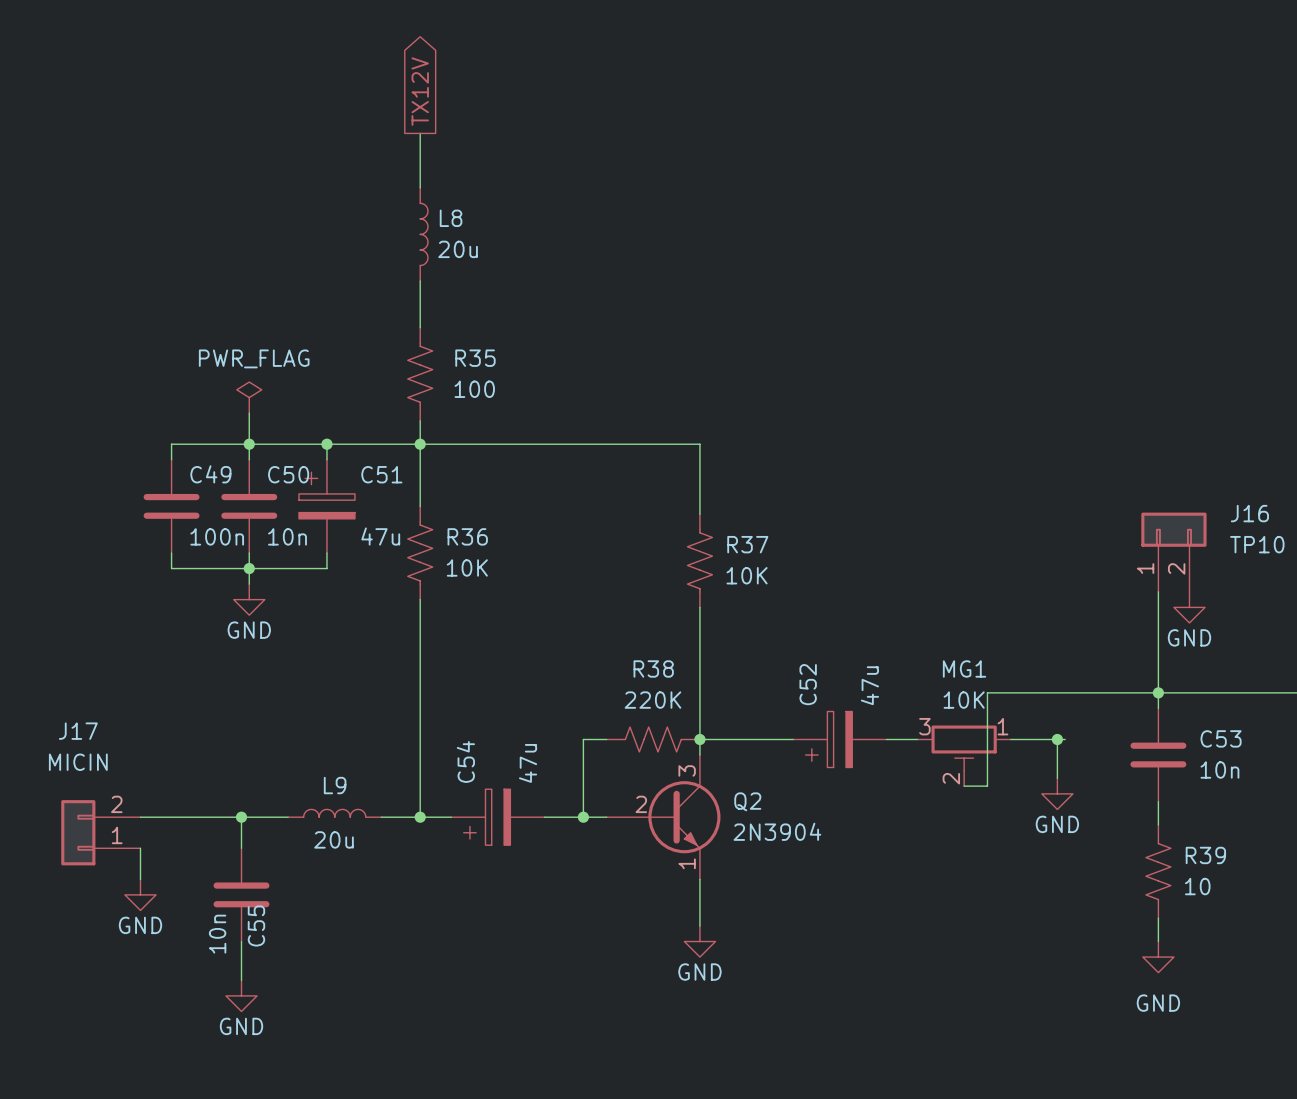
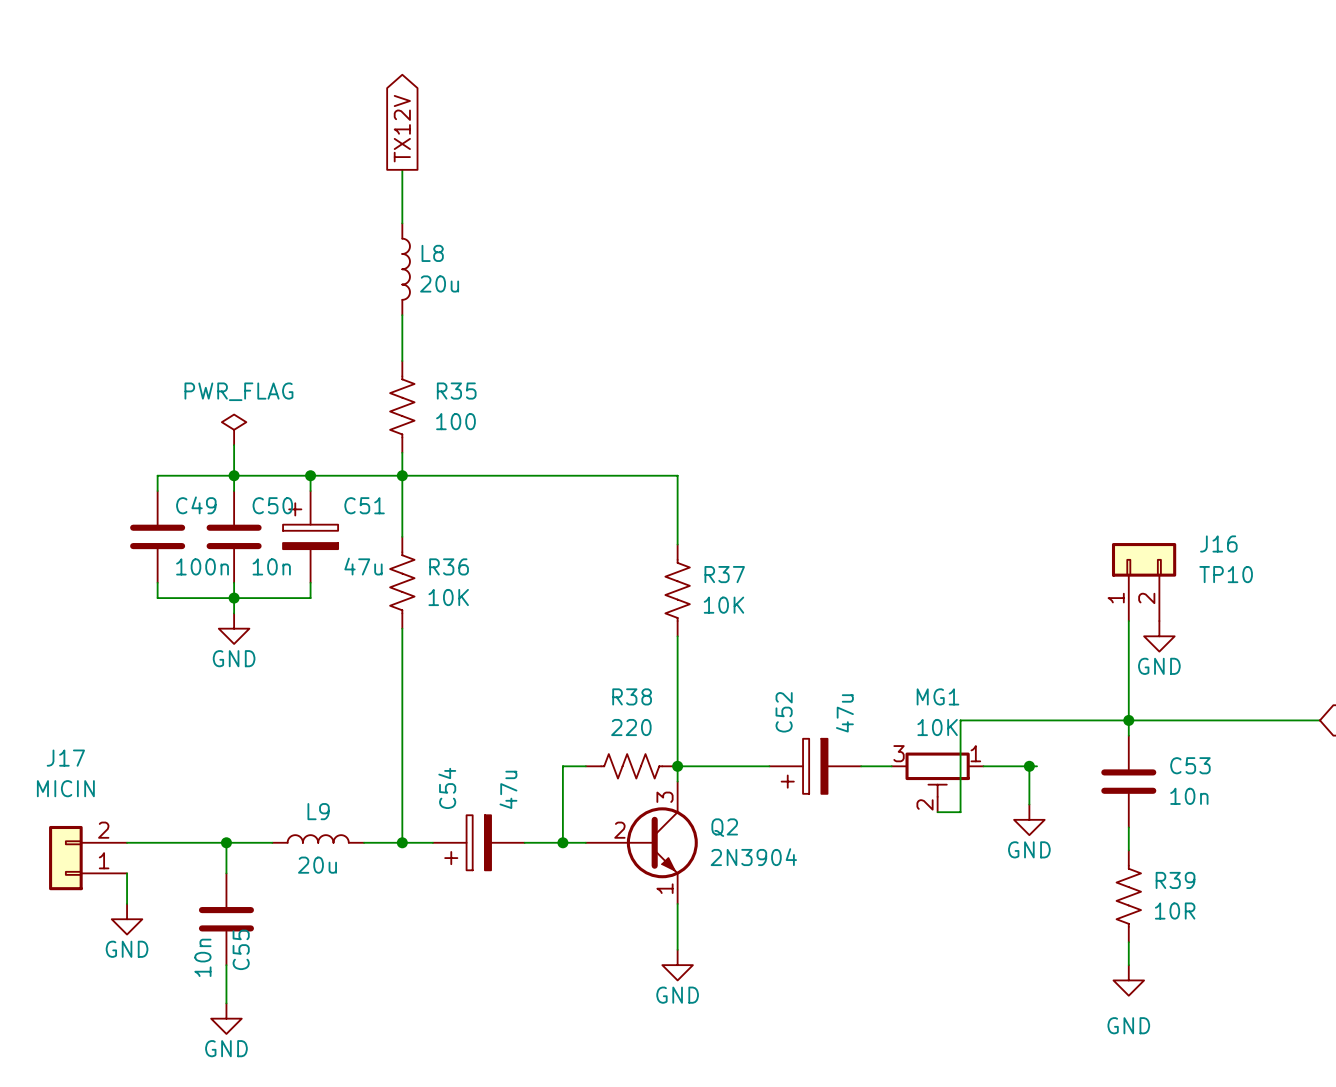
R38 value: 220K (652, 700) -> 220 (631, 727)
R39 value: 10 (1197, 886) -> 10R (1175, 911)

